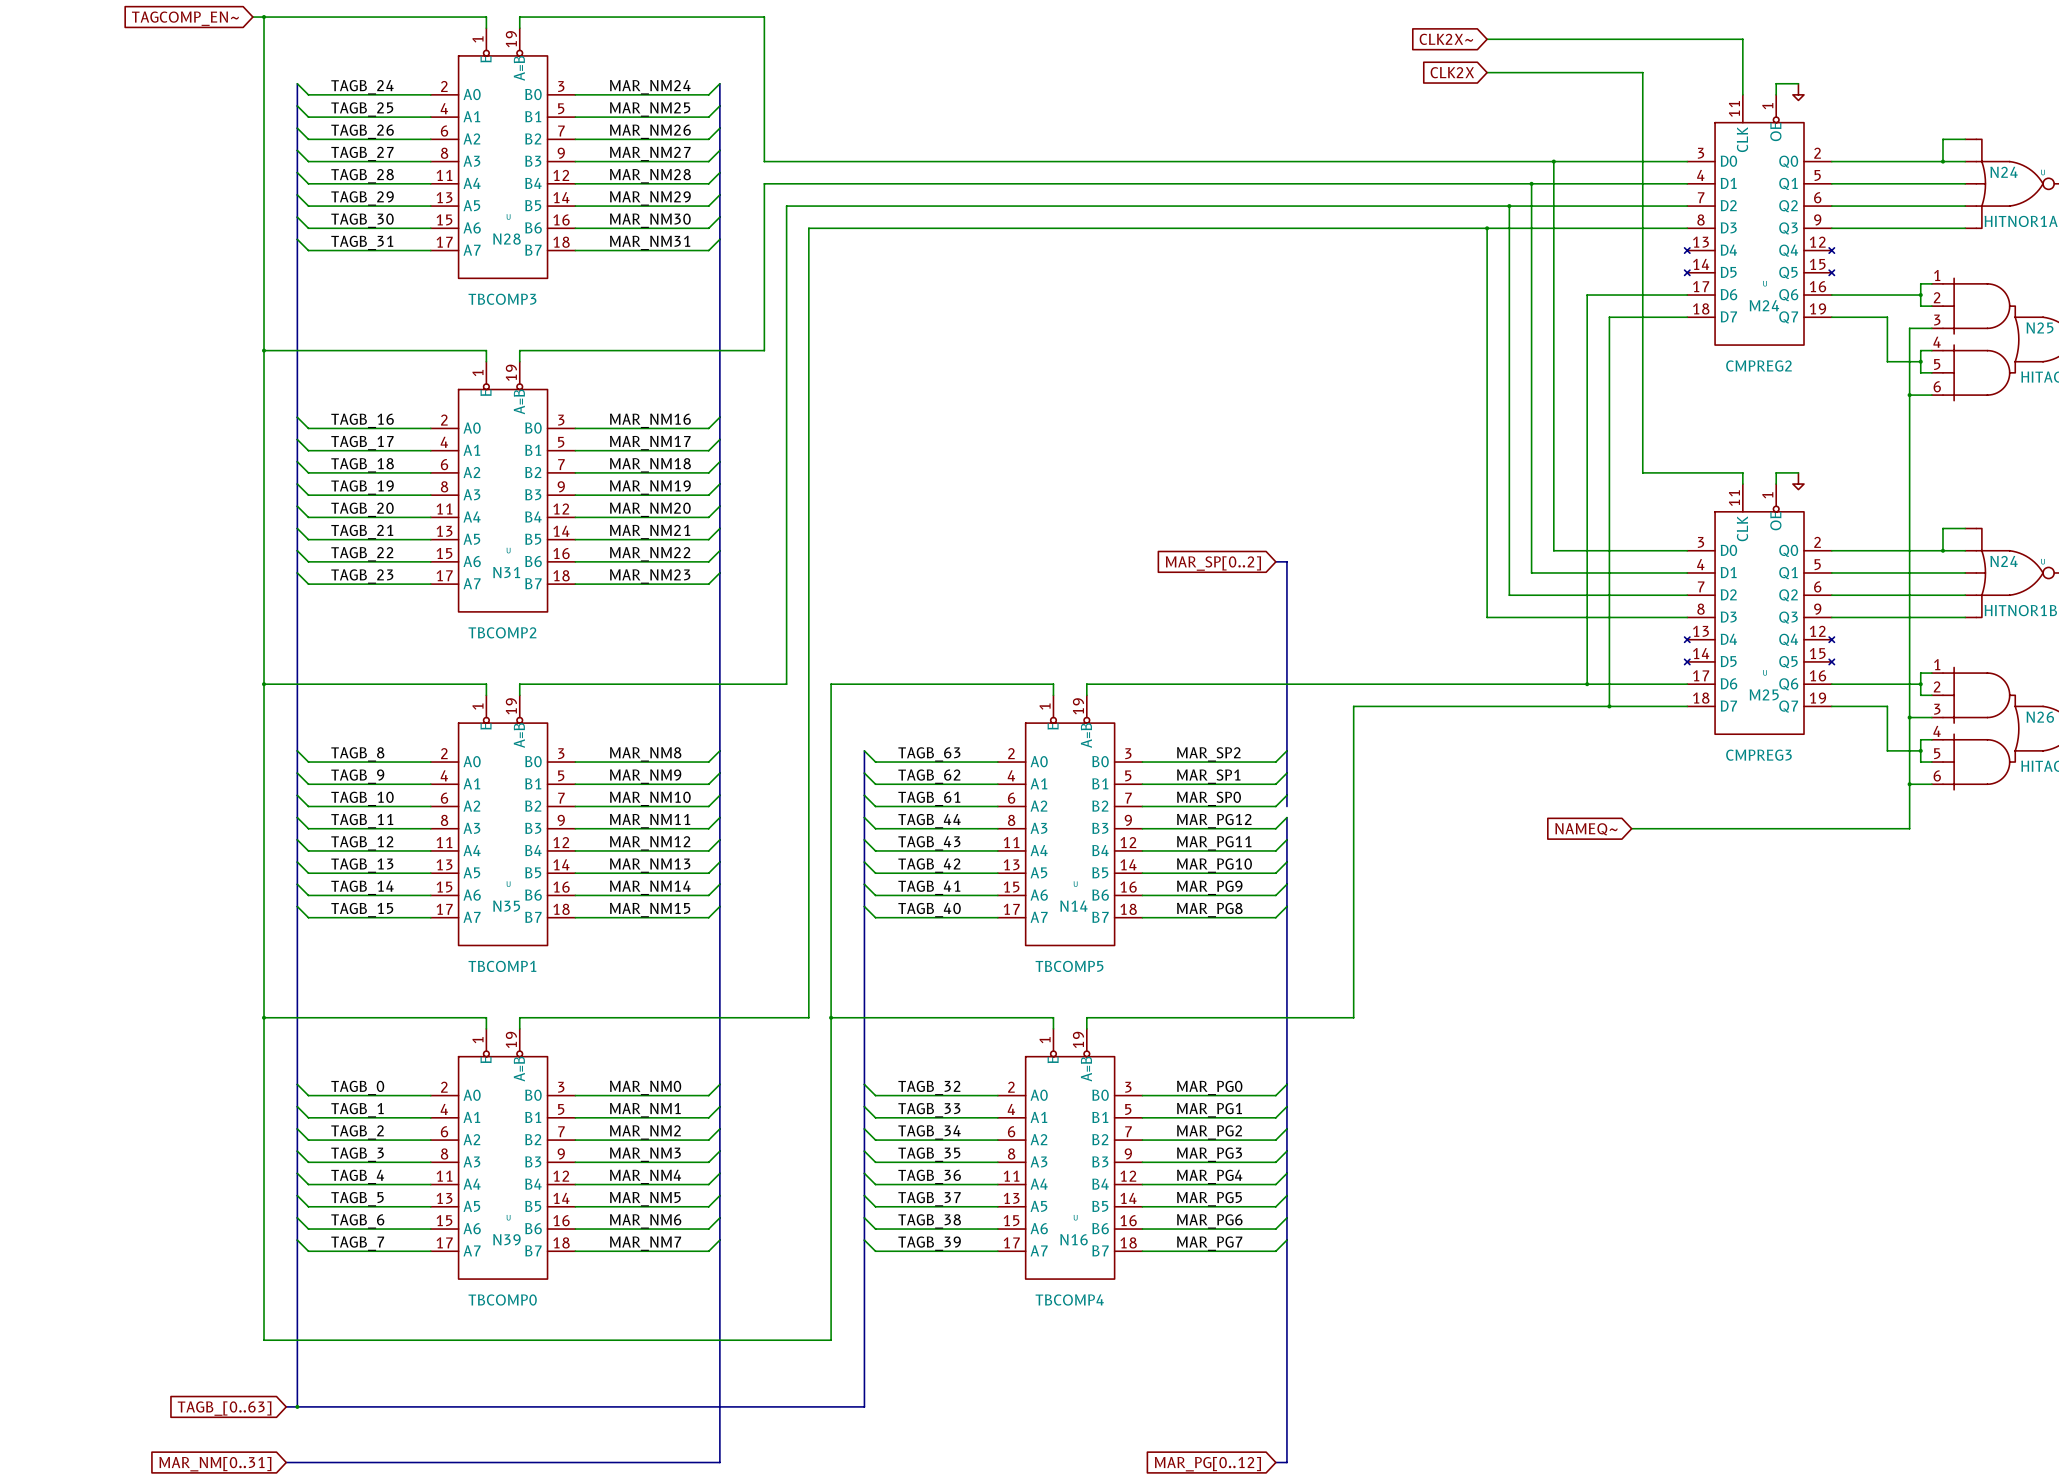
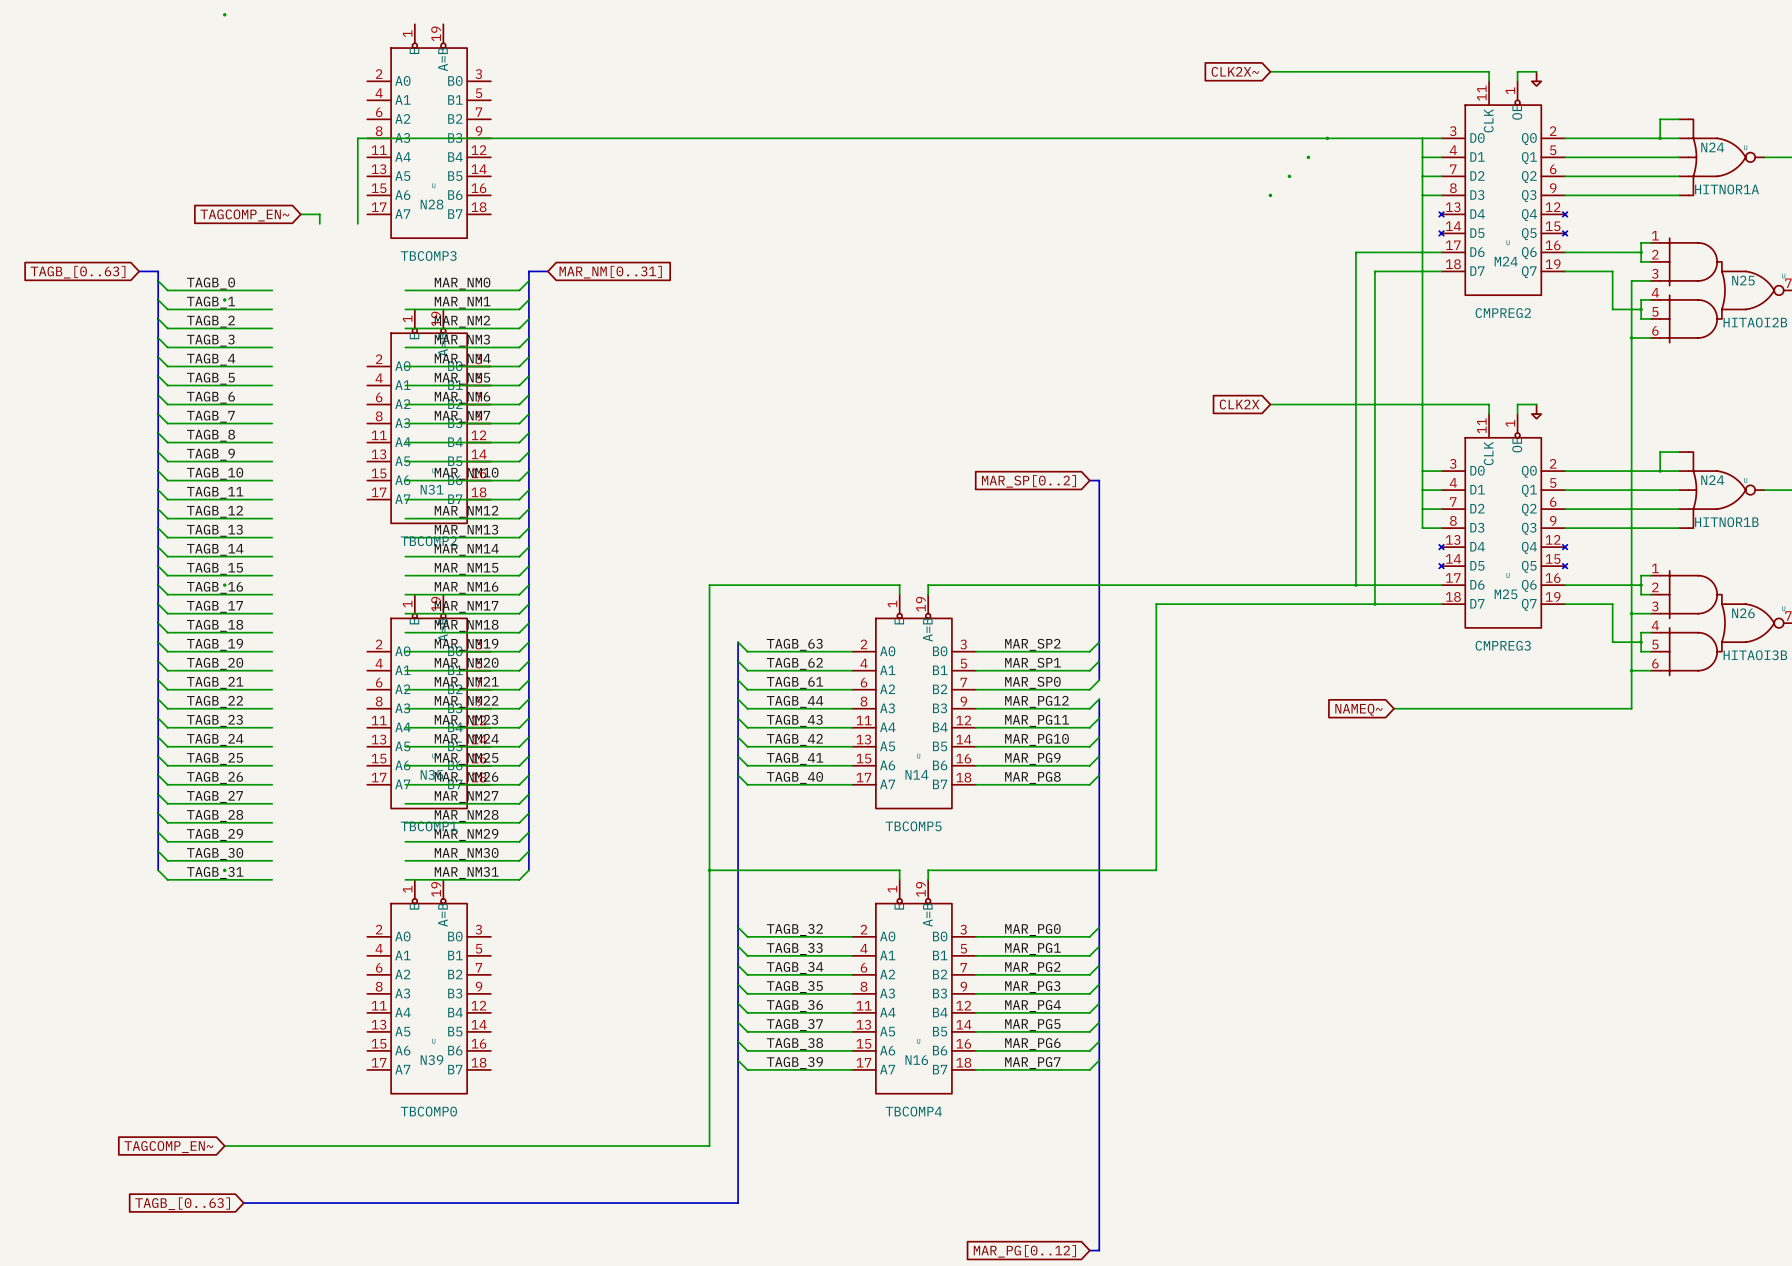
wire: (252, 17) (486, 17) (486, 28) -> none
wire: (264, 17) (264, 1340) -> none
global label: TAGCOMP_EN~ (185, 18) -> none
wire: (519, 28) (519, 17) (764, 17) (764, 161) -> none
global label position: CLK2X~ (1446, 39) -> CLK2X~ (1235, 71)
wire: (1487, 39) (1742, 39) (1742, 83) -> (1270, 71) (1489, 71)
global label: CLK2X (1452, 72) -> none
wire: (1487, 72) (1642, 72) (1642, 472) -> (1270, 404) (1403, 404)
wire: (297, 83) (308, 94) (430, 94) -> none
bus: (297, 83) (297, 1406) -> none
wire: (719, 83) (708, 94) (575, 94) -> none
bus: (719, 83) (719, 1462) (286, 1462) -> none
label: TAGB_24 (362, 87) -> none
label: MAR_NM24 (650, 87) -> none
wire: (297, 105) (308, 117) (430, 117) -> none
wire: (719, 105) (708, 117) (575, 117) -> none
label: TAGB_25 (362, 109) -> none
label: MAR_NM25 (650, 109) -> none
wire: (297, 128) (308, 139) (430, 139) -> none
wire: (719, 128) (708, 139) (575, 139) -> none
label: TAGB_26 (362, 131) -> none
label: MAR_NM26 (650, 131) -> none
wire: (297, 150) (308, 161) (419, 161) -> (357, 223) (357, 138)
wire: (719, 150) (708, 161) -> (652, 138) (604, 138)
label: TAGB_27 (362, 153) -> none
label: MAR_NM27 (650, 153) -> none
wire: none -> (367, 138) (490, 138)
wire: (1553, 161) (1553, 550) (1665, 550) -> none
wire: (297, 172) (308, 183) (430, 183) -> none
wire: (719, 172) (708, 183) (575, 183) -> none
label: TAGB_28 (362, 176) -> none
label: MAR_NM28 (650, 176) -> none
wire: (1531, 183) (1531, 572) (1665, 572) -> none
wire: (1665, 183) (764, 183) (764, 350) (519, 350) (519, 361) -> none
wire: (297, 194) (308, 206) (430, 206) -> none
wire: (719, 194) (708, 206) (575, 206) -> none
label: TAGB_29 (362, 198) -> none
label: MAR_NM29 (650, 198) -> none
wire: (1509, 206) (1509, 595) (1665, 595) -> none
wire: (1665, 206) (786, 206) (786, 684) (519, 684) (519, 695) -> none
wire: (297, 217) (308, 228) (430, 228) -> none
wire: (719, 217) (708, 228) (575, 228) -> none
label: TAGB_30 (362, 220) -> none
label: MAR_NM30 (650, 220) -> none
wire: (1487, 228) (1487, 617) (1665, 617) -> (1422, 138) (1422, 528)
wire: (1665, 228) (808, 228) (808, 1017) (519, 1017) (519, 1028) -> none
wire: (297, 239) (308, 250) (352, 250) -> none
wire: (719, 239) (708, 250) (575, 250) -> none
label: TAGB_31 (362, 242) -> none
label: MAR_NM31 (650, 242) -> none
wire: (375, 250) (430, 250) -> (319, 214) (319, 223)
global label: none -> TAGCOMP_EN~ (244, 215)
bus: none -> (139, 271) (158, 271) (158, 870)
bus: none -> (547, 271) (528, 271) (528, 870)
global label: none -> TAGB_[0..63] (78, 272)
global label: none -> MAR_NM[0..31] (610, 272)
wire: none -> (158, 280) (167, 290) (272, 290)
wire: none -> (528, 280) (519, 290) (405, 290)
label: none -> TAGB_0 (211, 283)
label: none -> MAR_NM0 (462, 283)
wire: none -> (158, 299) (167, 309) (272, 309)
wire: (264, 350) (486, 350) (486, 361) -> none
wire: none -> (528, 299) (519, 309) (405, 309)
label: none -> TAGB_1 (211, 302)
label: none -> MAR_NM1 (462, 302)
wire: none -> (158, 318) (167, 328) (272, 328)
wire: none -> (528, 318) (519, 328) (405, 328)
label: none -> TAGB_2 (210, 321)
label: none -> MAR_NM2 (462, 321)
wire: none -> (158, 337) (167, 347) (272, 347)
wire: none -> (528, 337) (519, 347) (405, 347)
label: none -> TAGB_3 (210, 340)
label: none -> MAR_NM3 (462, 340)
wire: (297, 417) (308, 428) -> (158, 356) (167, 366) (262, 366)
wire: (719, 417) (708, 428) (608, 428) -> (528, 356) (519, 366)
label: none -> TAGB_4 (211, 359)
label: TAGB_16 (362, 420) -> none
label: none -> MAR_NM4 (462, 359)
label: MAR_NM16 (650, 420) -> none
wire: (319, 428) (430, 428) -> none
wire: none -> (405, 366) (490, 366)
wire: (297, 439) (308, 450) -> (158, 376) (167, 385) (262, 385)
wire: (719, 439) (708, 450) (608, 450) -> (528, 376) (519, 385)
label: none -> TAGB_5 (210, 378)
label: TAGB_17 (362, 443) -> none
label: none -> MAR_NM5 (462, 378)
label: MAR_NM17 (650, 443) -> none
wire: (319, 450) (430, 450) -> none
wire: none -> (405, 385) (490, 385)
wire: (297, 461) (308, 472) -> (158, 395) (167, 404) (262, 404)
wire: (719, 461) (708, 472) (608, 472) -> (528, 395) (519, 404)
label: none -> TAGB_6 (210, 397)
label: TAGB_18 (362, 465) -> none
label: none -> MAR_NM6 (462, 397)
label: MAR_NM18 (650, 465) -> none
wire: (319, 472) (430, 472) -> none
wire: none -> (405, 404) (490, 404)
global label: none -> CLK2X (1239, 404)
wire: (297, 484) (308, 495) -> (158, 414) (167, 423) (262, 423)
wire: (719, 484) (708, 495) (608, 495) -> (528, 414) (519, 423)
label: none -> TAGB_7 (210, 416)
label: TAGB_19 (362, 487) -> none
label: none -> MAR_NM7 (462, 416)
label: MAR_NM19 (650, 487) -> none
wire: (319, 495) (430, 495) -> none
wire: none -> (405, 423) (490, 423)
wire: (297, 506) (308, 517) -> (158, 433) (167, 442) (262, 442)
wire: (719, 506) (708, 517) (608, 517) -> (528, 433) (519, 442)
label: none -> TAGB_8 (211, 435)
label: TAGB_20 (362, 509) -> none
label: MAR_NM20 (650, 509) -> none
wire: (319, 517) (430, 517) -> none
wire: none -> (405, 442) (490, 442)
wire: (297, 528) (308, 539) -> (158, 452) (167, 461) (262, 461)
wire: (719, 528) (708, 539) (608, 539) -> (528, 452) (519, 461)
label: none -> TAGB_9 (210, 454)
label: TAGB_21 (362, 532) -> none
label: MAR_NM21 (650, 532) -> none
wire: (319, 539) (430, 539) -> none
wire: none -> (405, 461) (490, 461)
wire: (297, 550) (308, 561) -> (158, 471) (167, 480) (262, 480)
wire: (719, 550) (708, 561) (608, 561) -> (528, 471) (519, 480)
label: none -> TAGB_10 (215, 473)
label: TAGB_22 (362, 554) -> none
label: none -> MAR_NM10 (466, 473)
label: MAR_NM22 (650, 554) -> none
wire: (319, 561) (430, 561) -> none
wire: none -> (405, 480) (490, 480)
wire: (297, 572) (308, 584) -> (158, 490) (167, 499) (262, 499)
wire: (719, 572) (708, 584) (608, 584) -> (528, 490) (519, 499)
label: none -> TAGB_11 (215, 492)
label: TAGB_23 (362, 576) -> none
label: MAR_NM23 (650, 576) -> none
wire: (319, 584) (430, 584) -> none
wire: none -> (405, 499) (490, 499)
wire: none -> (158, 509) (167, 518) (272, 518)
wire: none -> (528, 509) (519, 518) (405, 518)
label: none -> TAGB_12 (215, 511)
label: none -> MAR_NM12 (466, 511)
wire: none -> (158, 528) (167, 537) (272, 537)
wire: none -> (528, 528) (519, 537) (405, 537)
label: none -> TAGB_13 (214, 530)
label: none -> MAR_NM13 (466, 530)
wire: none -> (158, 547) (167, 556) (272, 556)
wire: none -> (528, 547) (519, 556) (405, 556)
label: none -> TAGB_14 (215, 549)
label: none -> MAR_NM14 (466, 549)
wire: none -> (158, 566) (167, 575) (272, 575)
wire: none -> (528, 566) (519, 575) (405, 575)
label: none -> TAGB_15 (215, 568)
label: none -> MAR_NM15 (466, 568)
wire: none -> (158, 585) (167, 594) (272, 594)
wire: (264, 684) (486, 684) (486, 695) -> none
wire: none -> (528, 585) (519, 594) (405, 594)
label: none -> TAGB_16 (215, 587)
label: none -> MAR_NM16 (466, 587)
wire: none -> (158, 604) (167, 613) (272, 613)
wire: none -> (528, 604) (519, 613) (405, 613)
label: none -> TAGB_17 (215, 606)
label: none -> MAR_NM17 (466, 606)
wire: none -> (158, 623) (167, 632) (272, 632)
wire: none -> (528, 623) (519, 632) (405, 632)
label: none -> TAGB_18 (215, 625)
label: none -> MAR_NM18 (466, 625)
wire: (297, 750) (308, 762) -> (158, 642) (167, 651) (262, 651)
wire: (719, 750) (708, 762) (608, 762) -> (528, 642) (519, 651)
label: none -> TAGB_19 (215, 644)
label: TAGB_8 (357, 754) -> none
label: none -> MAR_NM19 (466, 644)
label: MAR_NM8 (645, 754) -> none
wire: (319, 762) (430, 762) -> none
wire: none -> (405, 651) (490, 651)
wire: (297, 773) (308, 784) -> (158, 661) (167, 670) (262, 670)
wire: (719, 773) (708, 784) (608, 784) -> (528, 661) (519, 670)
label: none -> TAGB_20 (215, 663)
label: TAGB_9 (357, 776) -> none
label: none -> MAR_NM20 (466, 663)
label: MAR_NM9 (645, 776) -> none
wire: (319, 784) (430, 784) -> none
wire: none -> (405, 670) (490, 670)
wire: (297, 795) (308, 806) -> (158, 680) (167, 689) (262, 689)
wire: (719, 795) (708, 806) (608, 806) -> (528, 680) (519, 689)
bus: (1286, 795) (1286, 806) -> none
label: none -> TAGB_21 (215, 682)
label: TAGB_10 (362, 798) -> none
label: none -> MAR_NM21 (466, 682)
label: MAR_NM10 (650, 798) -> none
wire: (319, 806) (430, 806) -> none
wire: none -> (405, 689) (490, 689)
wire: (297, 817) (308, 828) -> (158, 699) (167, 708) (262, 708)
wire: (719, 817) (708, 828) (608, 828) -> (528, 699) (519, 708)
label: none -> TAGB_22 (215, 701)
label: TAGB_11 (362, 821) -> none
label: none -> MAR_NM22 (466, 701)
label: MAR_NM11 (650, 821) -> none
wire: (319, 828) (430, 828) -> none
wire: none -> (405, 708) (490, 708)
wire: (297, 839) (308, 850) -> (158, 718) (167, 727) (262, 727)
wire: (719, 839) (708, 850) (608, 850) -> (528, 718) (519, 727)
label: none -> TAGB_23 (214, 720)
label: TAGB_12 (362, 843) -> none
label: none -> MAR_NM23 (466, 720)
label: MAR_NM12 (650, 843) -> none
wire: (319, 850) (430, 850) -> none
wire: none -> (405, 727) (490, 727)
wire: (297, 862) (308, 873) -> (158, 737) (167, 746) (262, 746)
wire: (719, 862) (708, 873) (608, 873) -> (528, 737) (519, 746)
label: none -> TAGB_24 (215, 739)
label: TAGB_13 (362, 865) -> none
label: none -> MAR_NM24 (466, 739)
label: MAR_NM13 (650, 865) -> none
wire: (319, 873) (430, 873) -> none
wire: none -> (405, 746) (490, 746)
wire: (297, 884) (308, 895) -> (158, 756) (167, 765) (262, 765)
wire: (719, 884) (708, 895) (608, 895) -> (528, 756) (519, 765)
label: none -> TAGB_25 (215, 758)
label: TAGB_14 (362, 887) -> none
label: none -> MAR_NM25 (466, 758)
label: MAR_NM14 (650, 887) -> none
wire: (319, 895) (430, 895) -> none
wire: none -> (405, 765) (490, 765)
wire: (297, 906) (308, 917) -> (158, 775) (167, 784) (262, 784)
wire: (719, 906) (708, 917) (608, 917) -> (528, 775) (519, 784)
label: none -> TAGB_26 (215, 777)
label: TAGB_15 (362, 910) -> none
label: none -> MAR_NM26 (466, 777)
label: MAR_NM15 (650, 910) -> none
wire: (319, 917) (430, 917) -> none
wire: none -> (405, 784) (490, 784)
wire: none -> (158, 794) (167, 803) (272, 803)
wire: none -> (528, 794) (519, 803) (405, 803)
label: none -> TAGB_27 (215, 796)
label: none -> MAR_NM27 (466, 796)
wire: none -> (158, 813) (167, 822) (272, 822)
wire: none -> (528, 813) (519, 822) (405, 822)
label: none -> TAGB_28 (215, 815)
label: none -> MAR_NM28 (466, 815)
wire: none -> (158, 832) (167, 841) (272, 841)
wire: none -> (528, 832) (519, 841) (405, 841)
label: none -> TAGB_29 (215, 834)
label: none -> MAR_NM29 (466, 834)
wire: none -> (158, 851) (167, 860) (272, 860)
wire: none -> (528, 851) (519, 860) (405, 860)
label: none -> TAGB_30 (215, 853)
label: none -> MAR_NM30 (466, 853)
wire: none -> (158, 870) (167, 879) (272, 879)
wire: (264, 1017) (486, 1017) (486, 1028) -> none
wire: none -> (528, 870) (519, 879) (405, 879)
label: none -> TAGB_31 (215, 872)
label: none -> MAR_NM31 (466, 872)
wire: (297, 1084) (308, 1095) (430, 1095) -> none
wire: (719, 1084) (708, 1095) (575, 1095) -> none
label: TAGB_0 (357, 1088) -> none
label: MAR_NM0 (645, 1088) -> none
wire: (297, 1106) (308, 1117) (430, 1117) -> none
wire: (719, 1106) (708, 1117) (575, 1117) -> none
label: TAGB_1 (357, 1110) -> none
label: MAR_NM1 (645, 1110) -> none
wire: (297, 1128) (308, 1140) (430, 1140) -> none
wire: (719, 1128) (708, 1140) (575, 1140) -> none
label: TAGB_2 (357, 1132) -> none
label: MAR_NM2 (645, 1132) -> none
wire: (297, 1151) (308, 1162) (430, 1162) -> none
wire: (719, 1151) (708, 1162) (575, 1162) -> none
label: TAGB_3 (357, 1154) -> none
label: MAR_NM3 (645, 1154) -> none
wire: (297, 1173) (308, 1184) (430, 1184) -> none
wire: (719, 1173) (708, 1184) (575, 1184) -> none
label: TAGB_4 (357, 1176) -> none
label: MAR_NM4 (645, 1176) -> none
wire: (297, 1195) (308, 1206) (430, 1206) -> none
wire: (719, 1195) (708, 1206) (575, 1206) -> none
label: TAGB_5 (357, 1199) -> none
label: MAR_NM5 (645, 1199) -> none
wire: (297, 1217) (308, 1229) (430, 1229) -> none
wire: (719, 1217) (708, 1229) (575, 1229) -> none
label: TAGB_6 (357, 1221) -> none
label: MAR_NM6 (645, 1221) -> none
wire: (297, 1240) (308, 1251) (430, 1251) -> none
wire: (719, 1240) (708, 1251) (575, 1251) -> none
label: TAGB_7 (357, 1243) -> none
label: MAR_NM7 (645, 1243) -> none
global label: none -> TAGCOMP_EN~ (168, 1147)
junction: (297, 1406) -> none
global label: MAR_NM[0..31] (215, 1464) -> none

